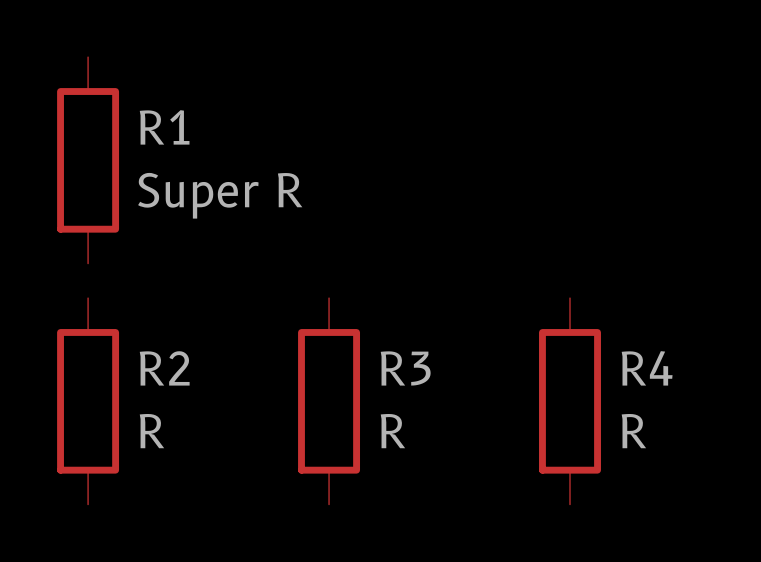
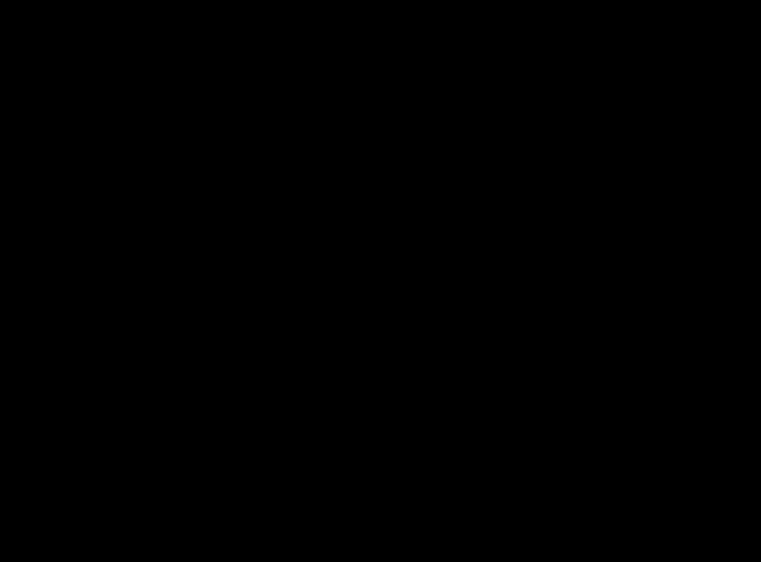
R1: Super R (88, 160) -> none
R2: R (88, 401) -> none
R3: R (329, 401) -> none
R4: R (570, 401) -> none

